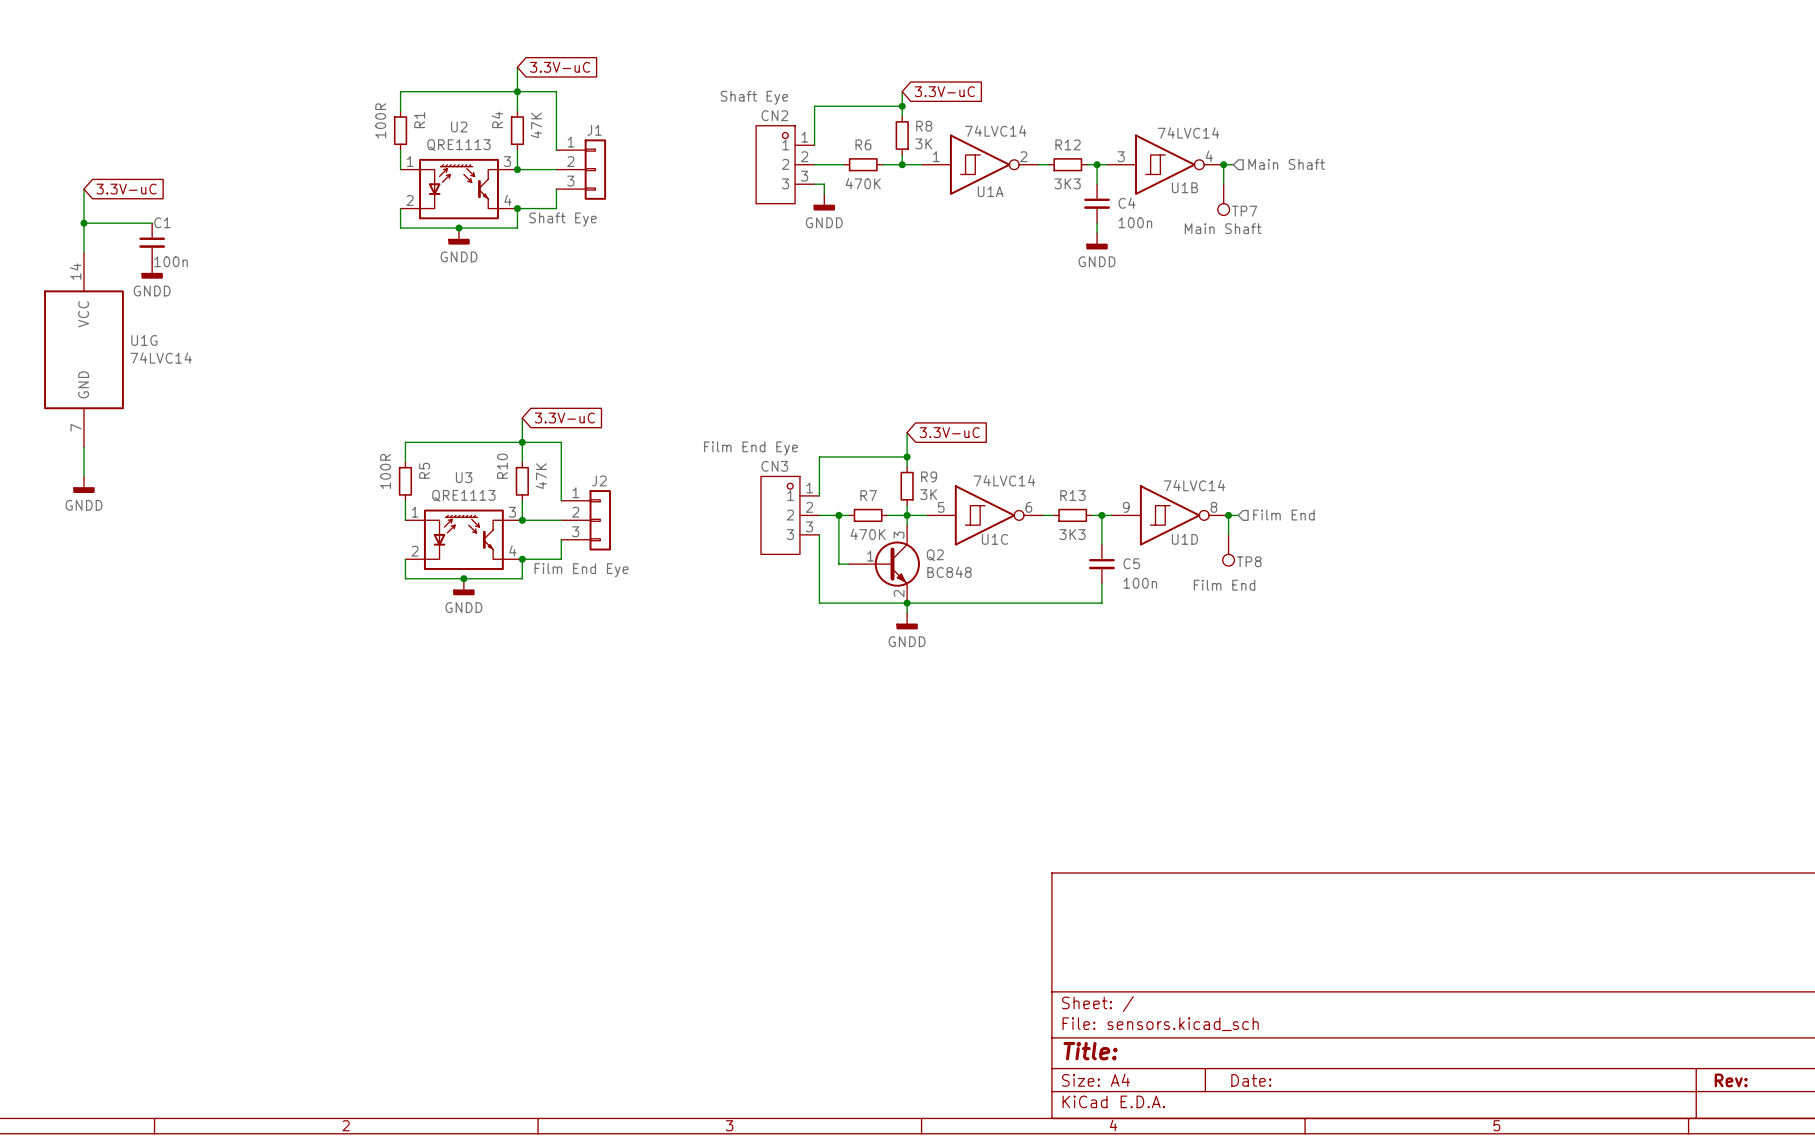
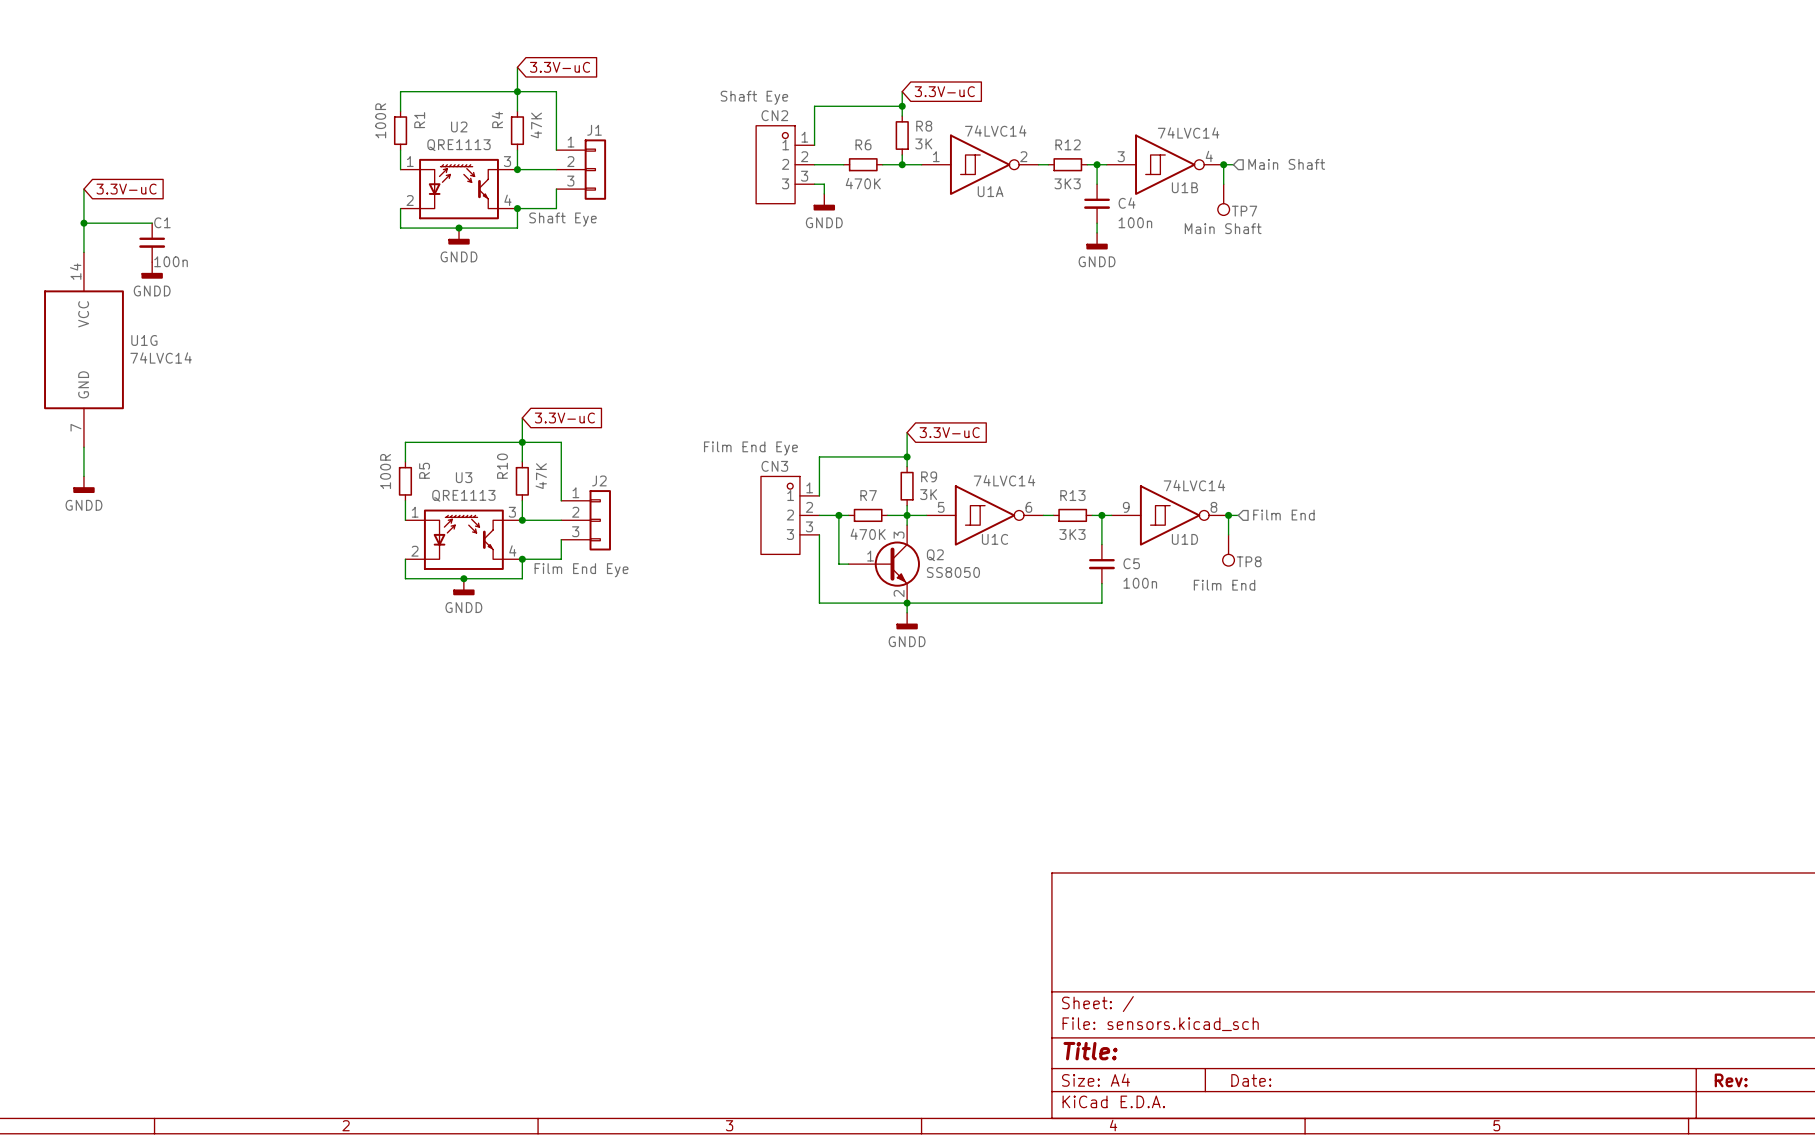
Q2 value: BC848 (949, 572) -> SS8050 (953, 572)

